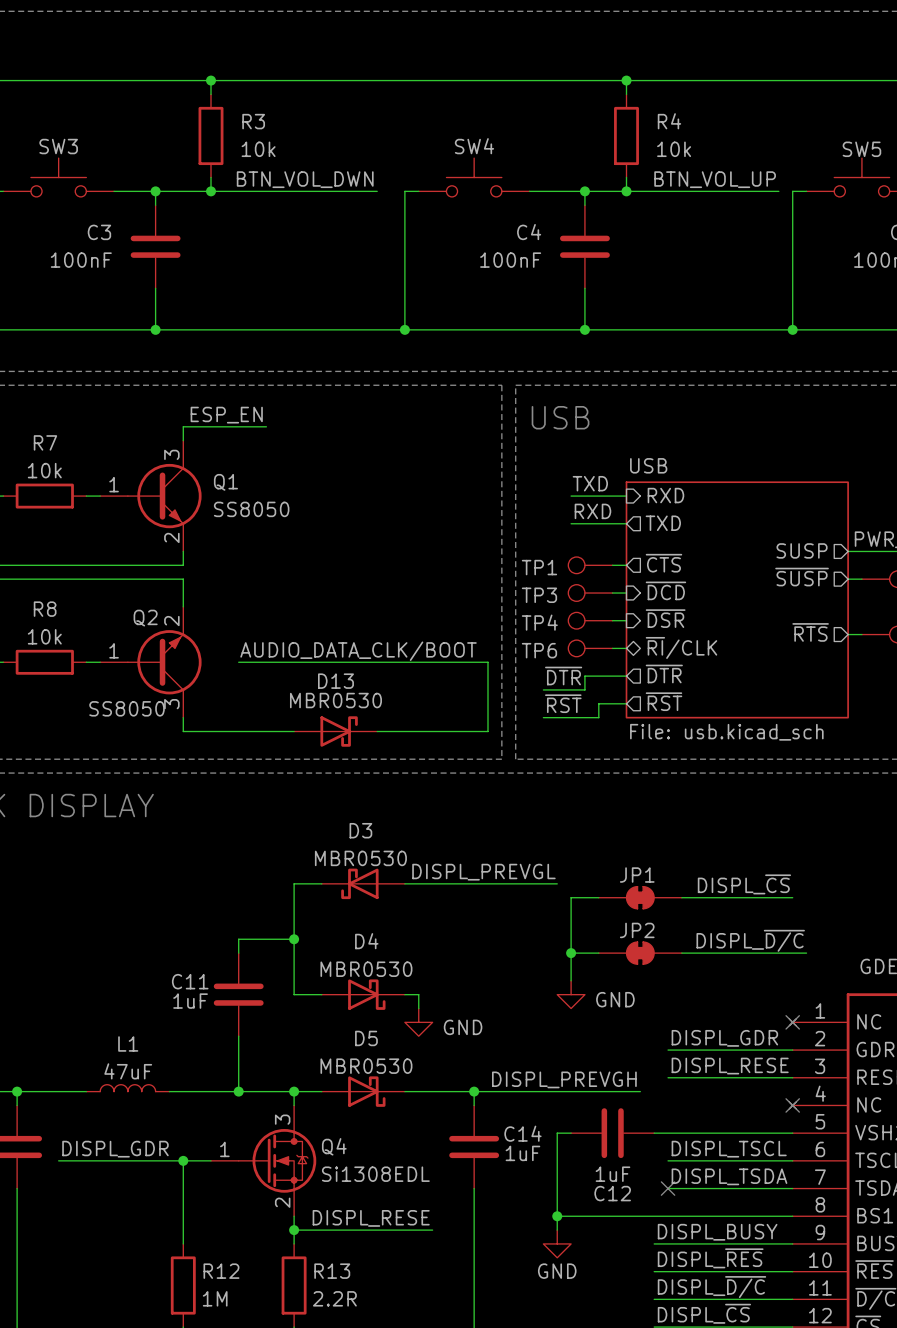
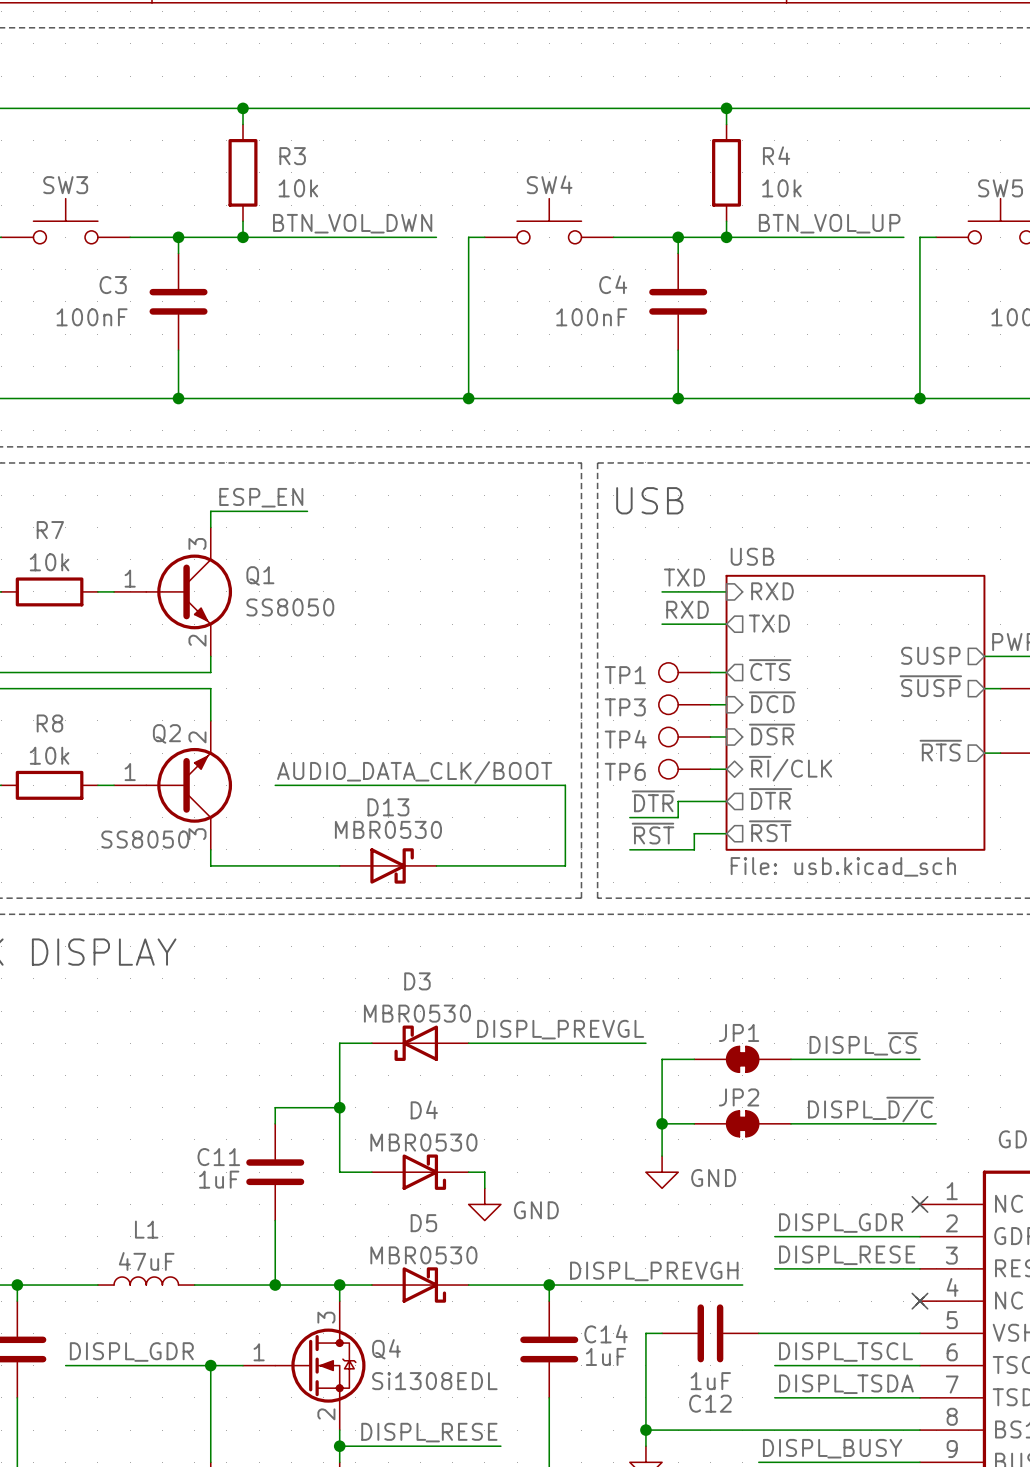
no-connect mark: (668, 1188) -> none

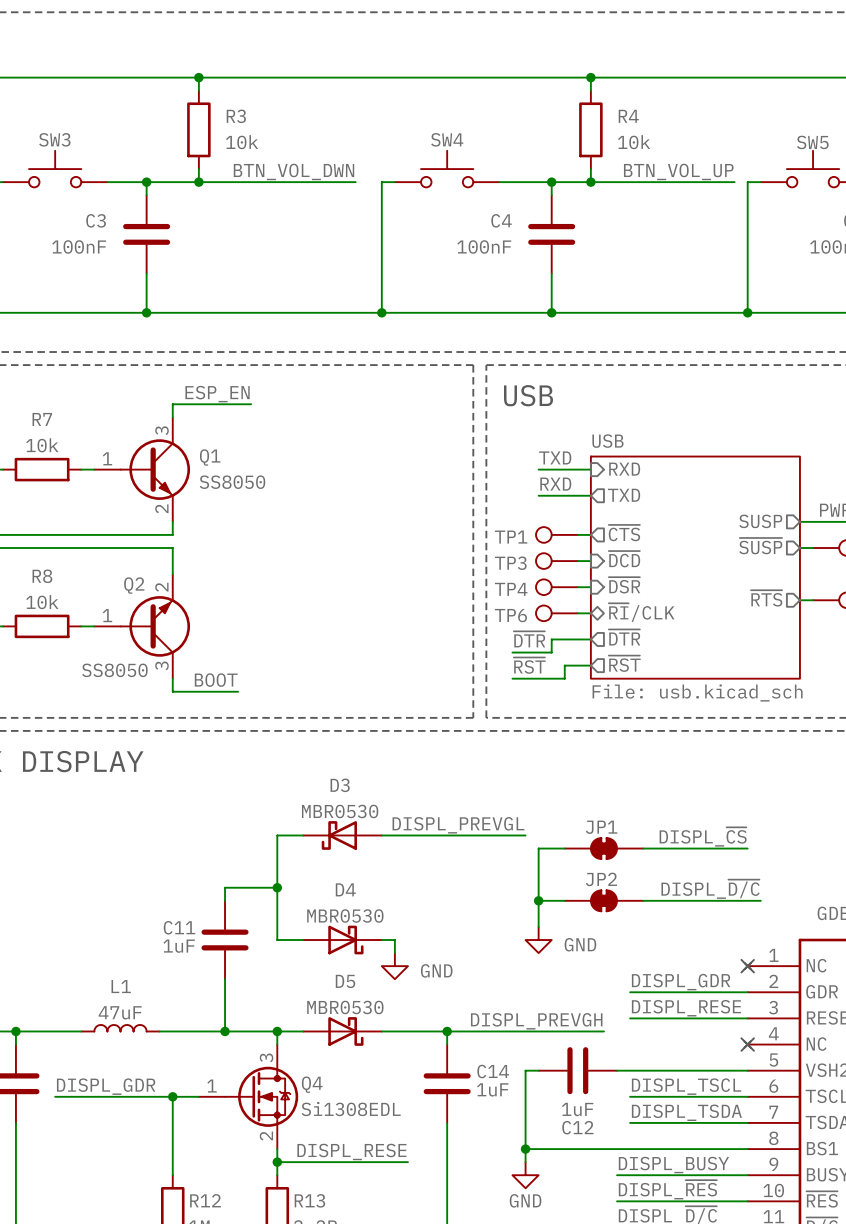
label: AUDIO_DATA_CLK/BOOT (414, 772) -> none
wire: (275, 785) (565, 785) (565, 865) (436, 865) -> none
label: none -> BOOT (216, 680)
wire: (291, 865) (339, 865) -> none
D13: MBR0530 (388, 865) -> none

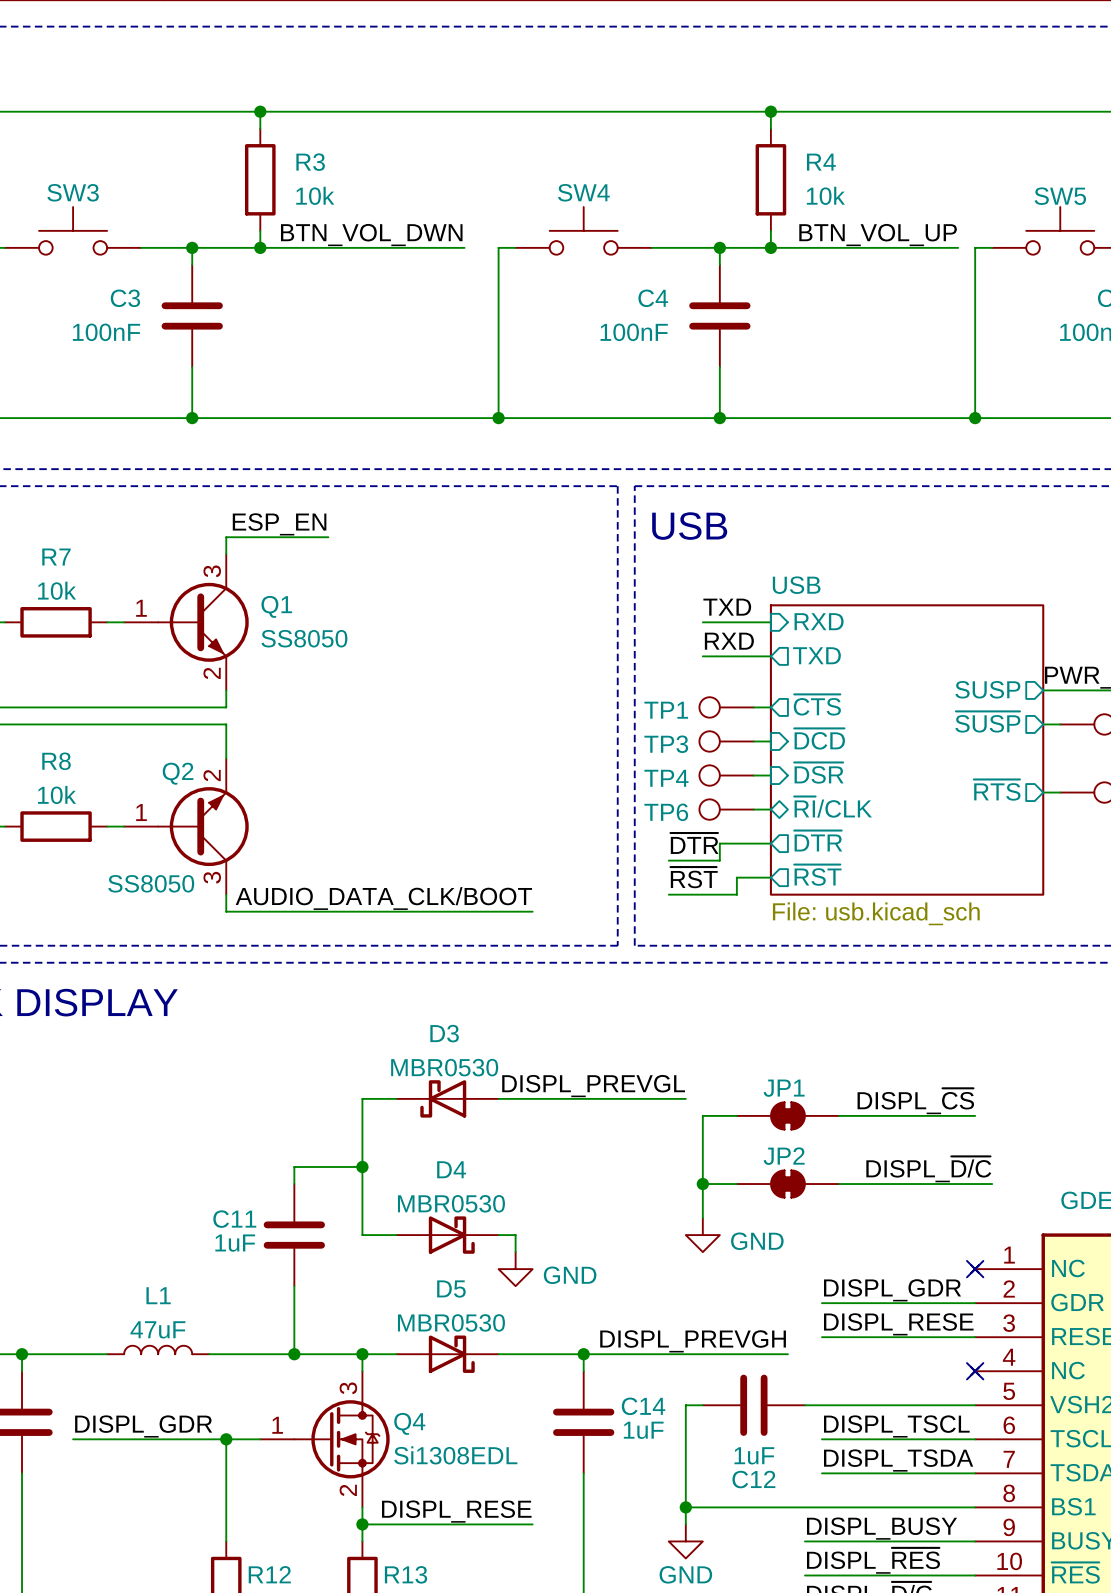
label: BOOT (216, 680) -> none
label: none -> AUDIO_DATA_CLK/BOOT (383, 898)
wire: none -> (311, 911) (532, 911)

